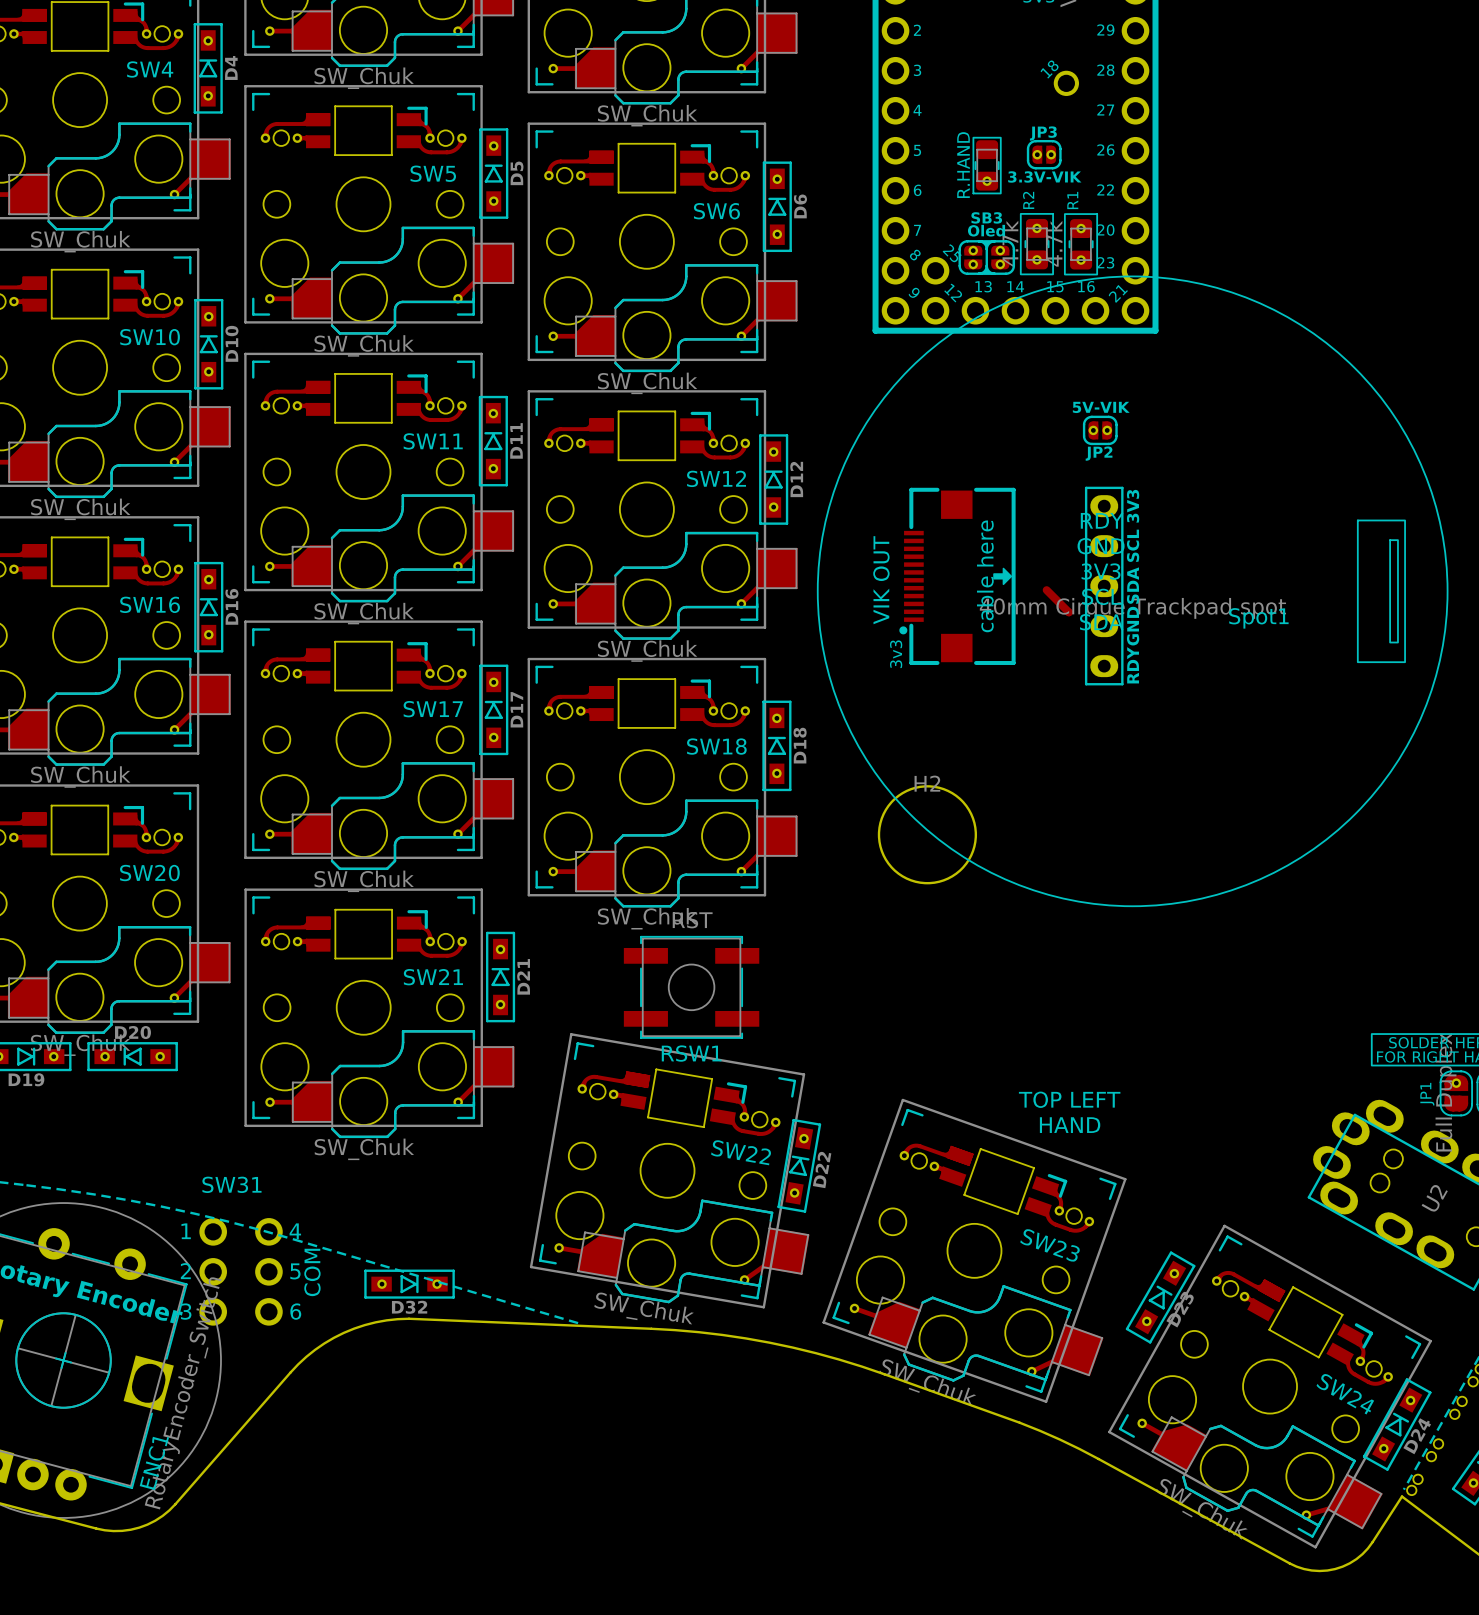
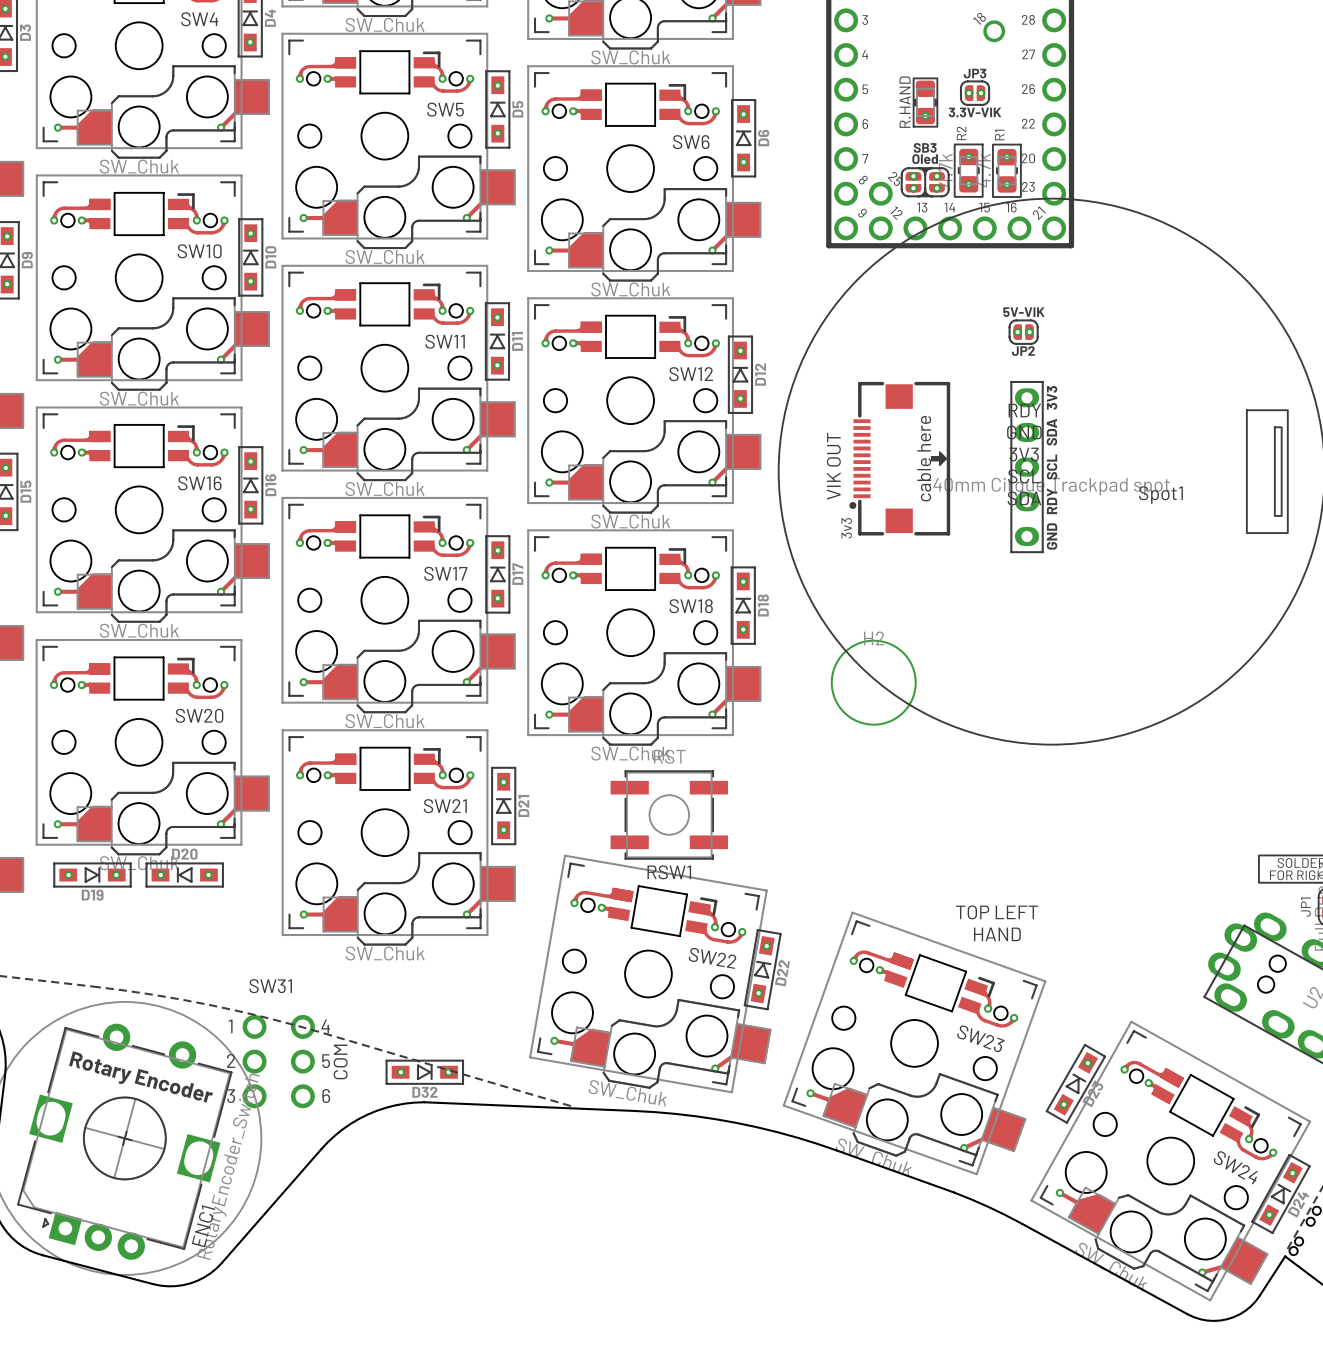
part text: SCL (1133, 545) -> SDA (1051, 432)
part text: SDA (1133, 585) -> SCL (1052, 467)
part: (1057, 601) -> none
part text: GND (1133, 626) -> RDY (1052, 501)
part text: RDY (1133, 665) -> GND (1052, 536)

